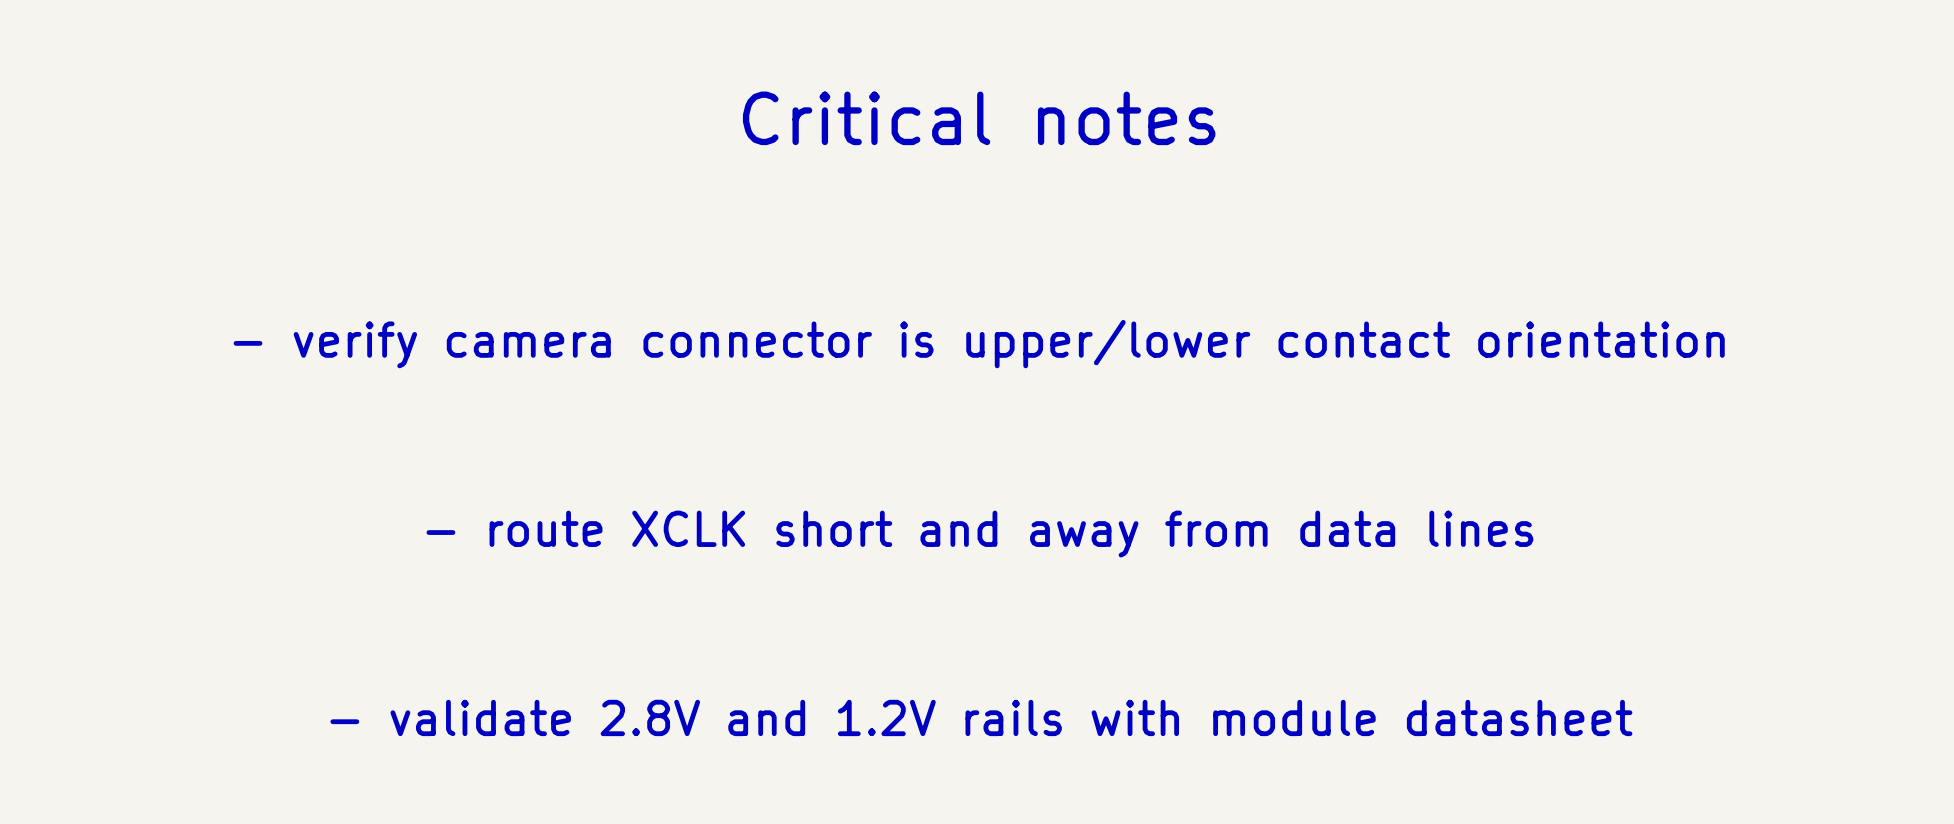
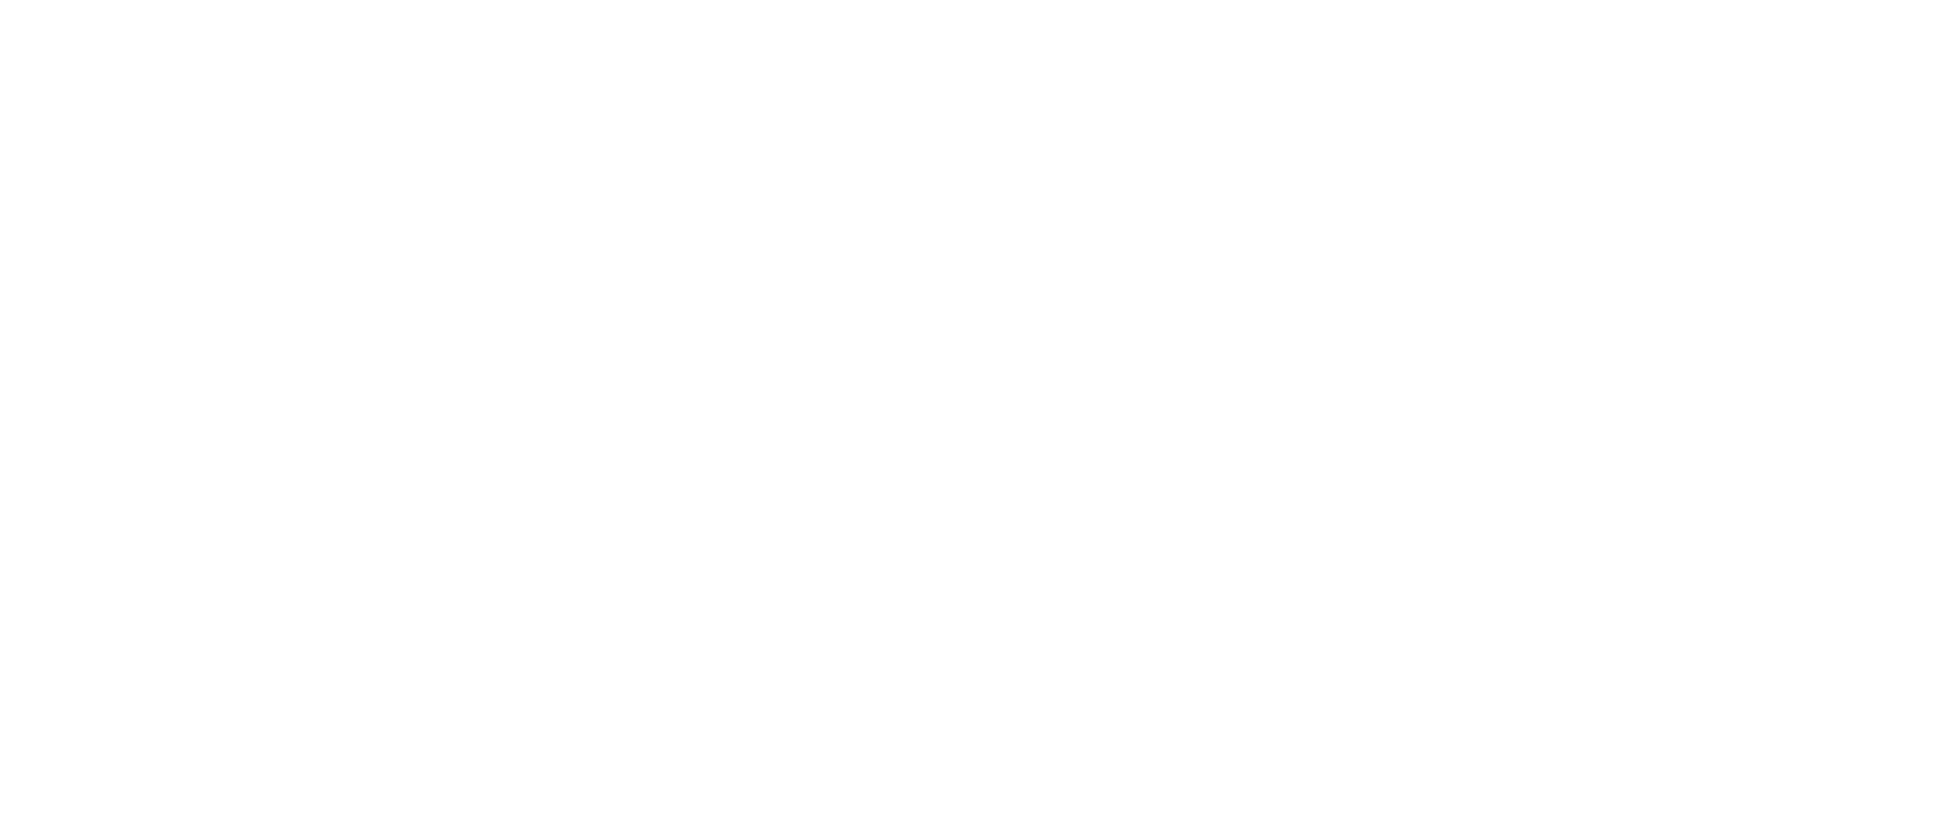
text: Critical notes (979, 118) -> none
text: - verify camera connector is upper/lower contact orientation (979, 344) -> none
text: - route XCLK short and away from data lines (979, 534) -> none
text: - validate 2.8V and 1.2V rails with module datasheet (981, 717) -> none

